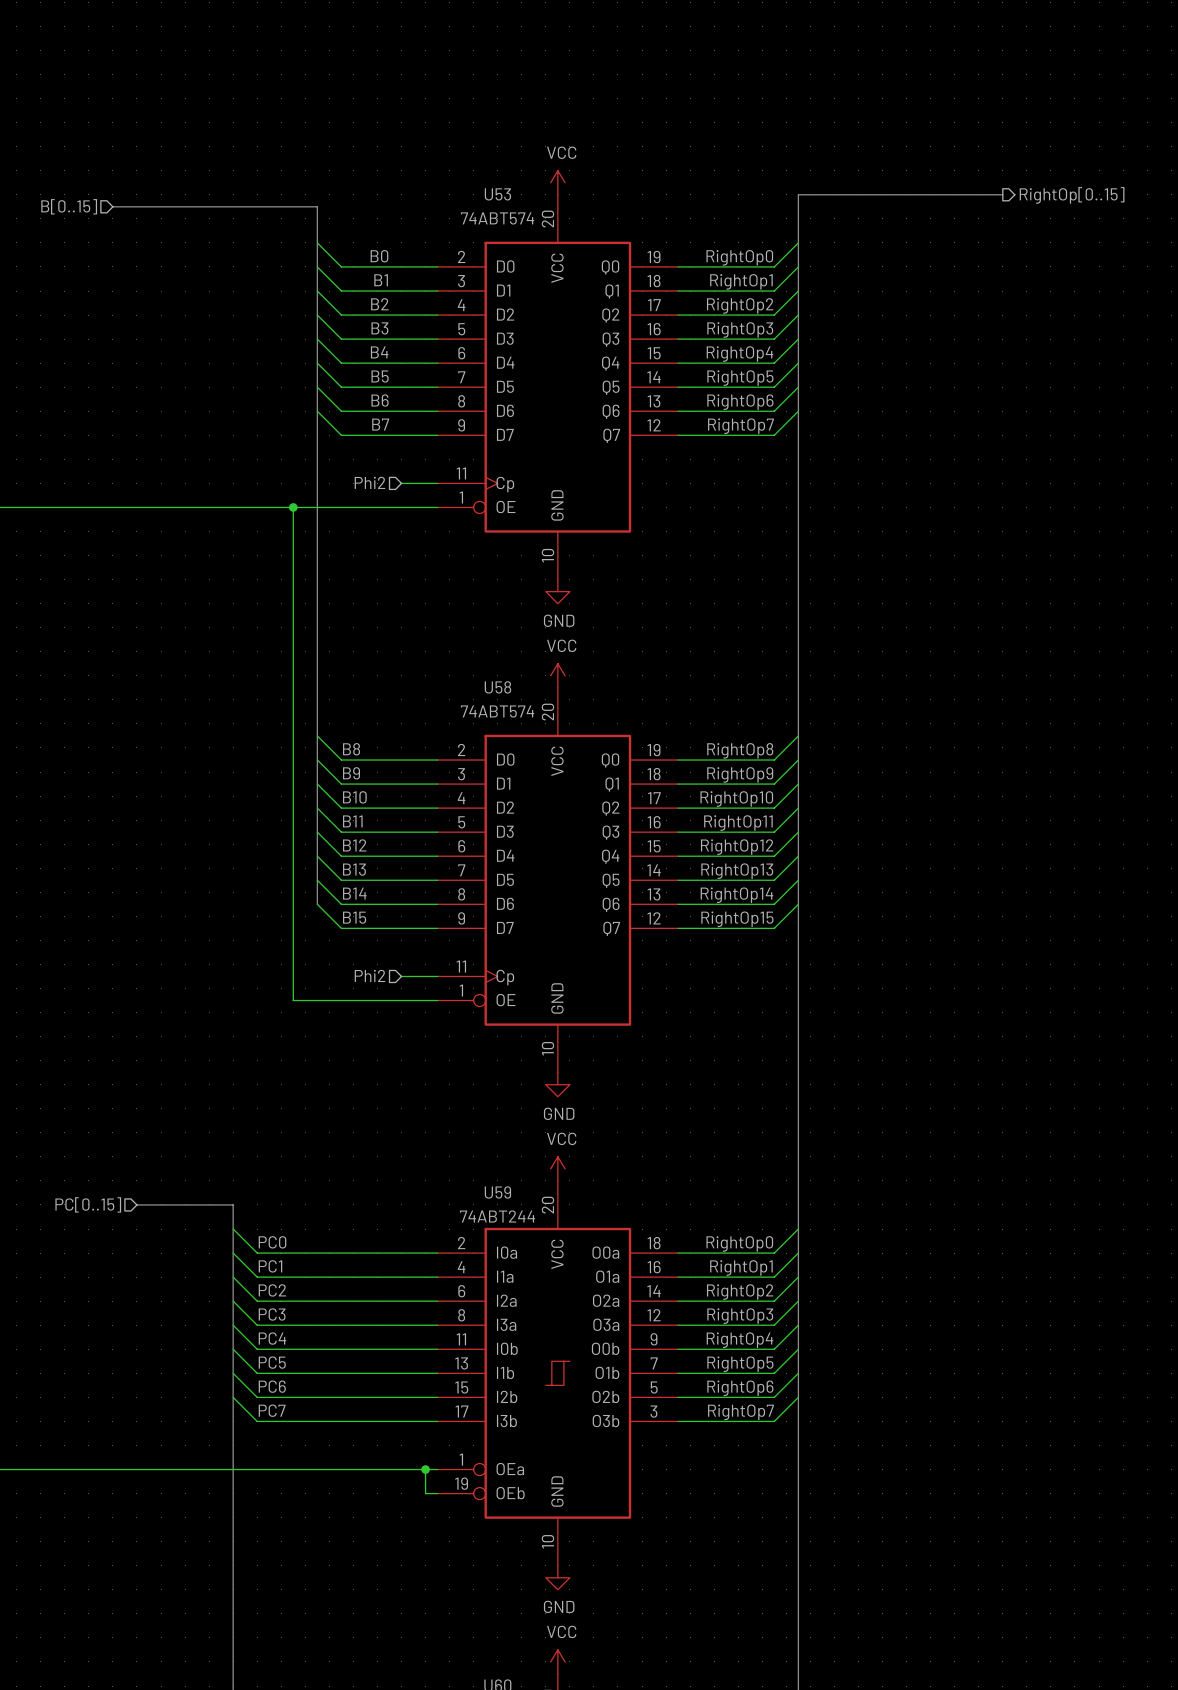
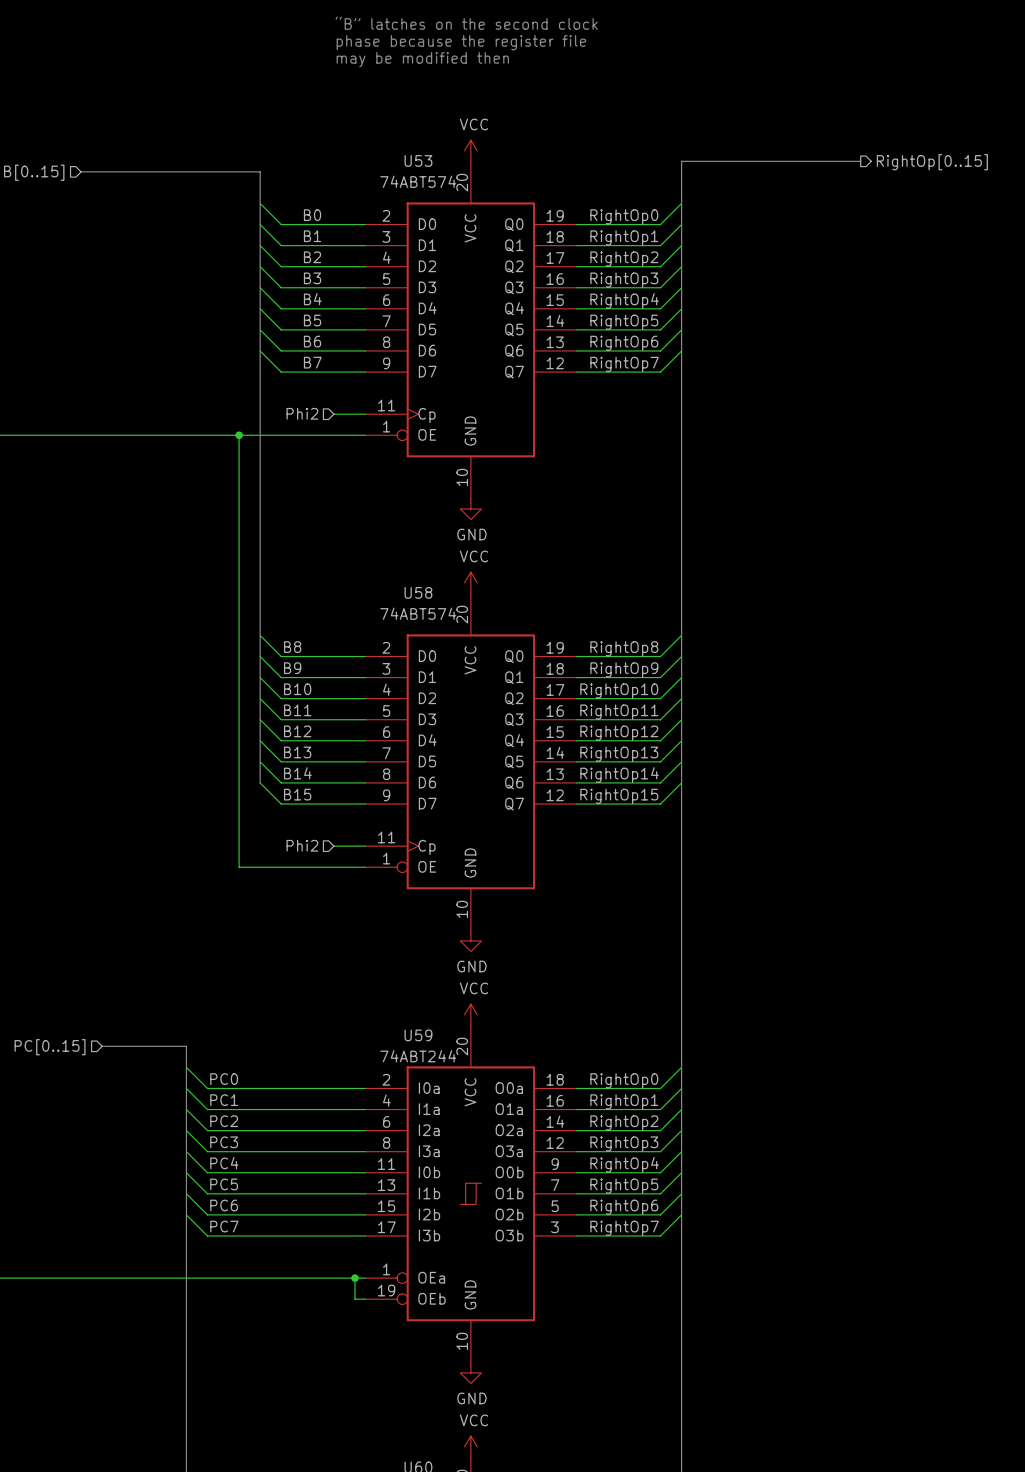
text: none -> “B” latches on the second clock (466, 23)
text: none -> phase because the register file (461, 42)
text: none -> may be modified then (422, 59)

